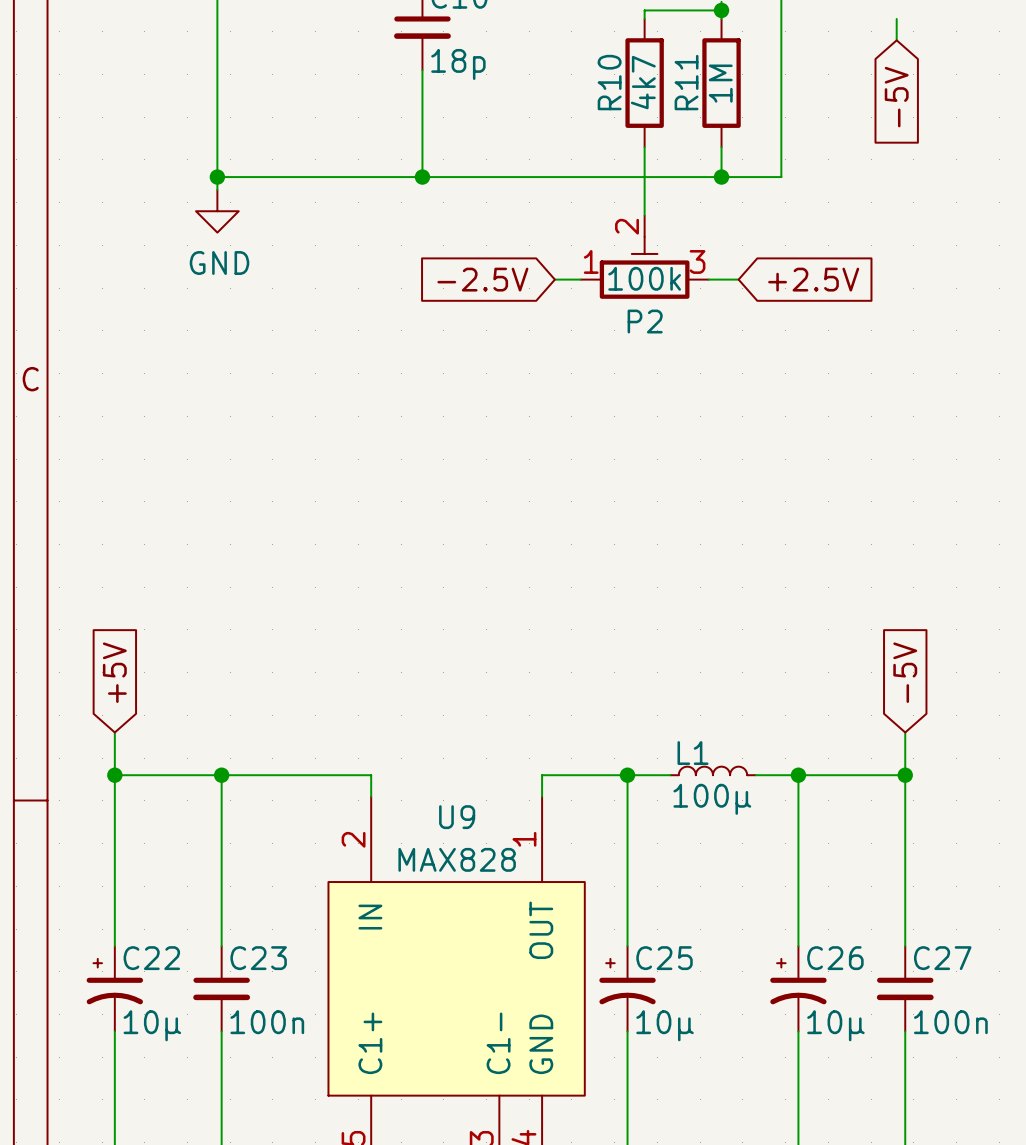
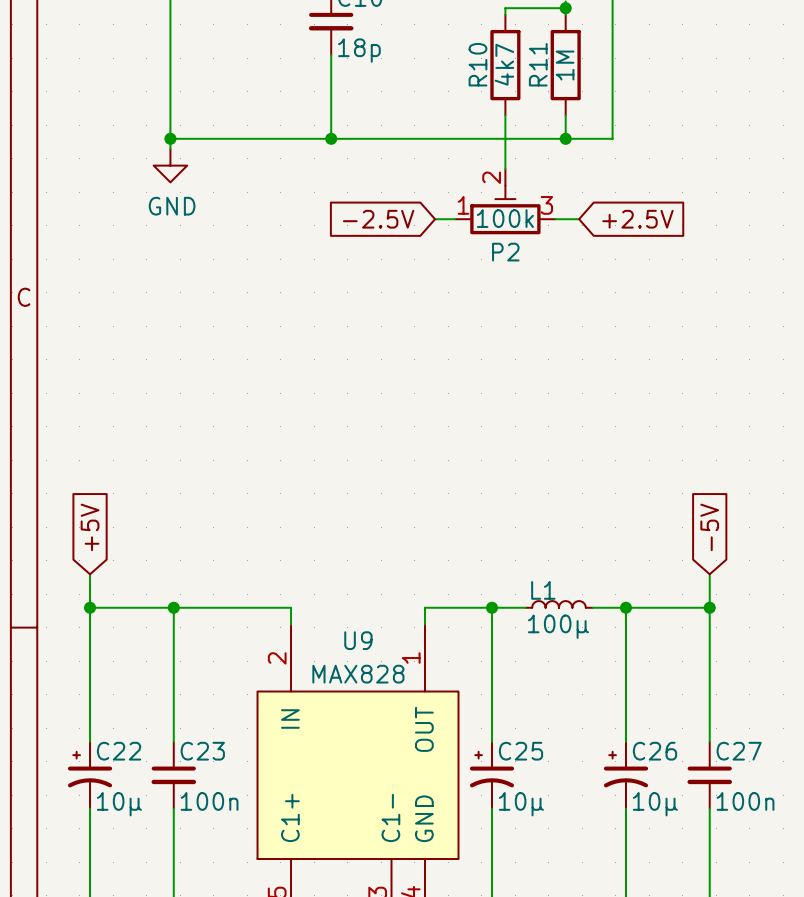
wire: (896, 18) (896, 40) -> none
global label: -5V (896, 97) -> none

